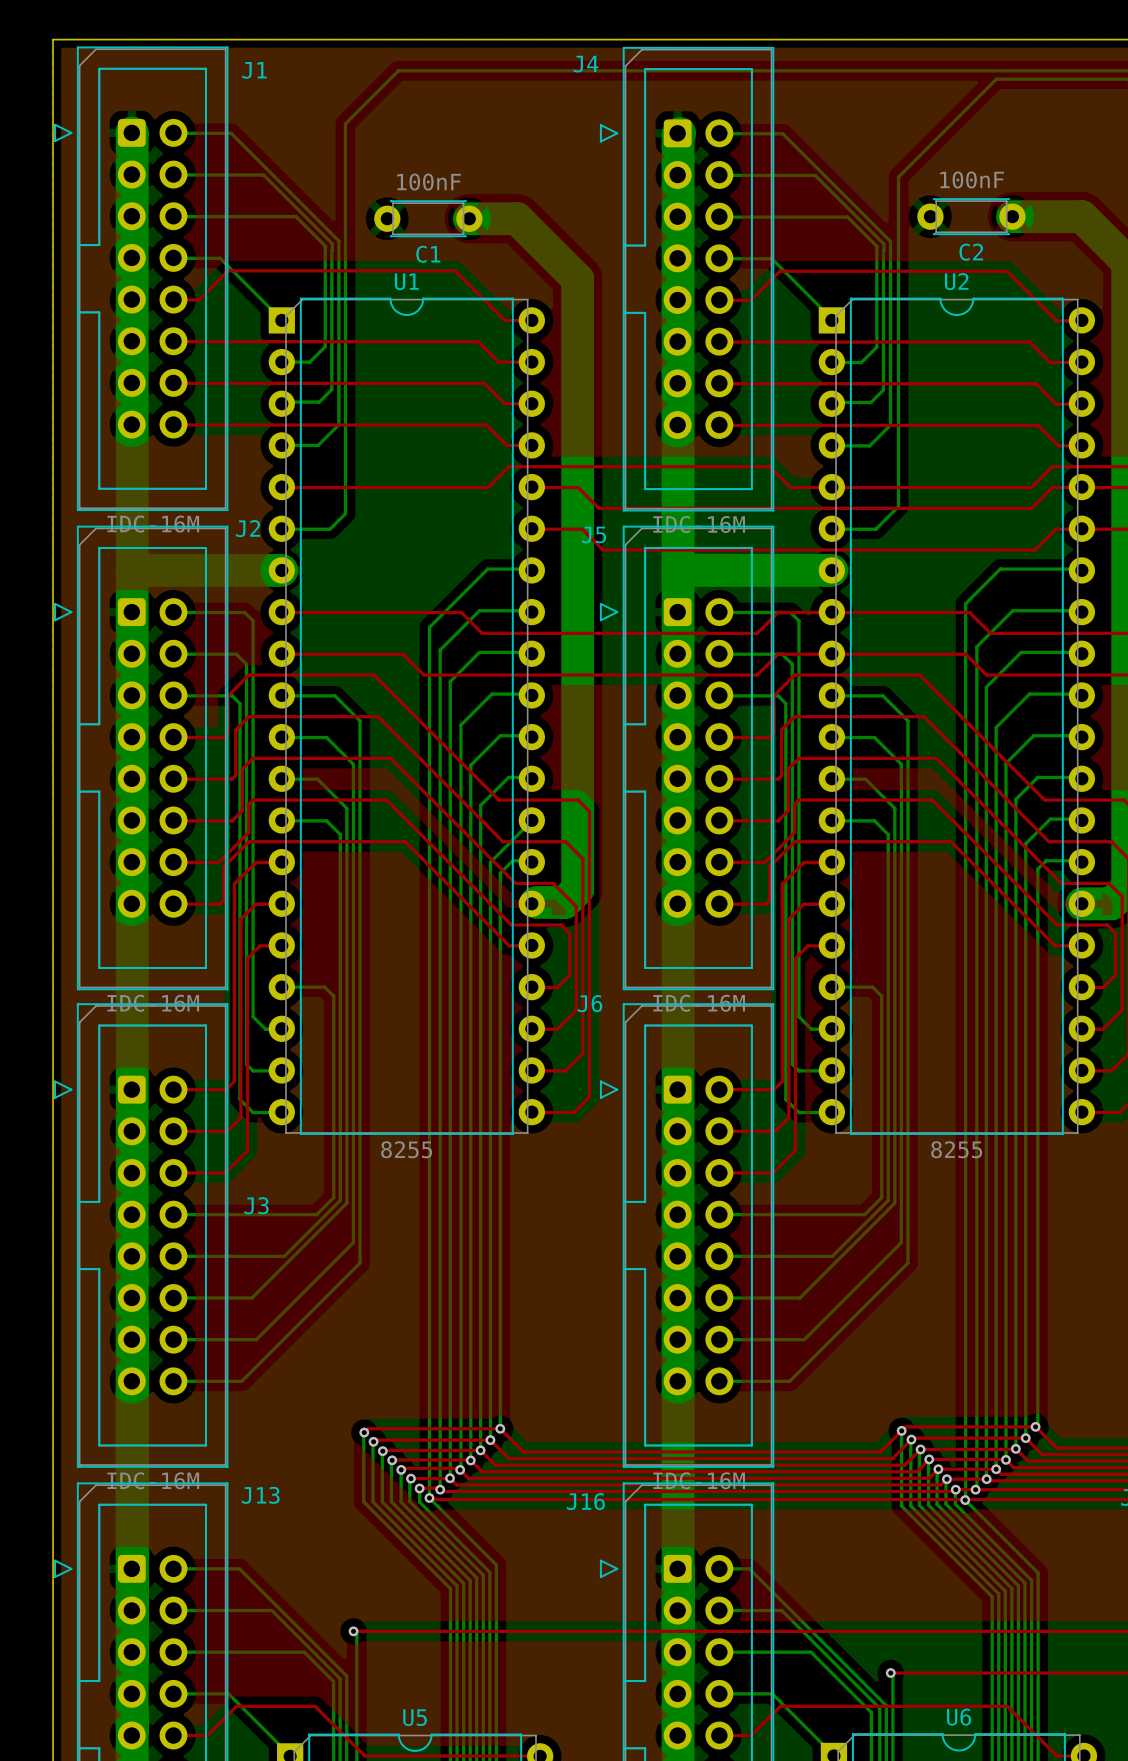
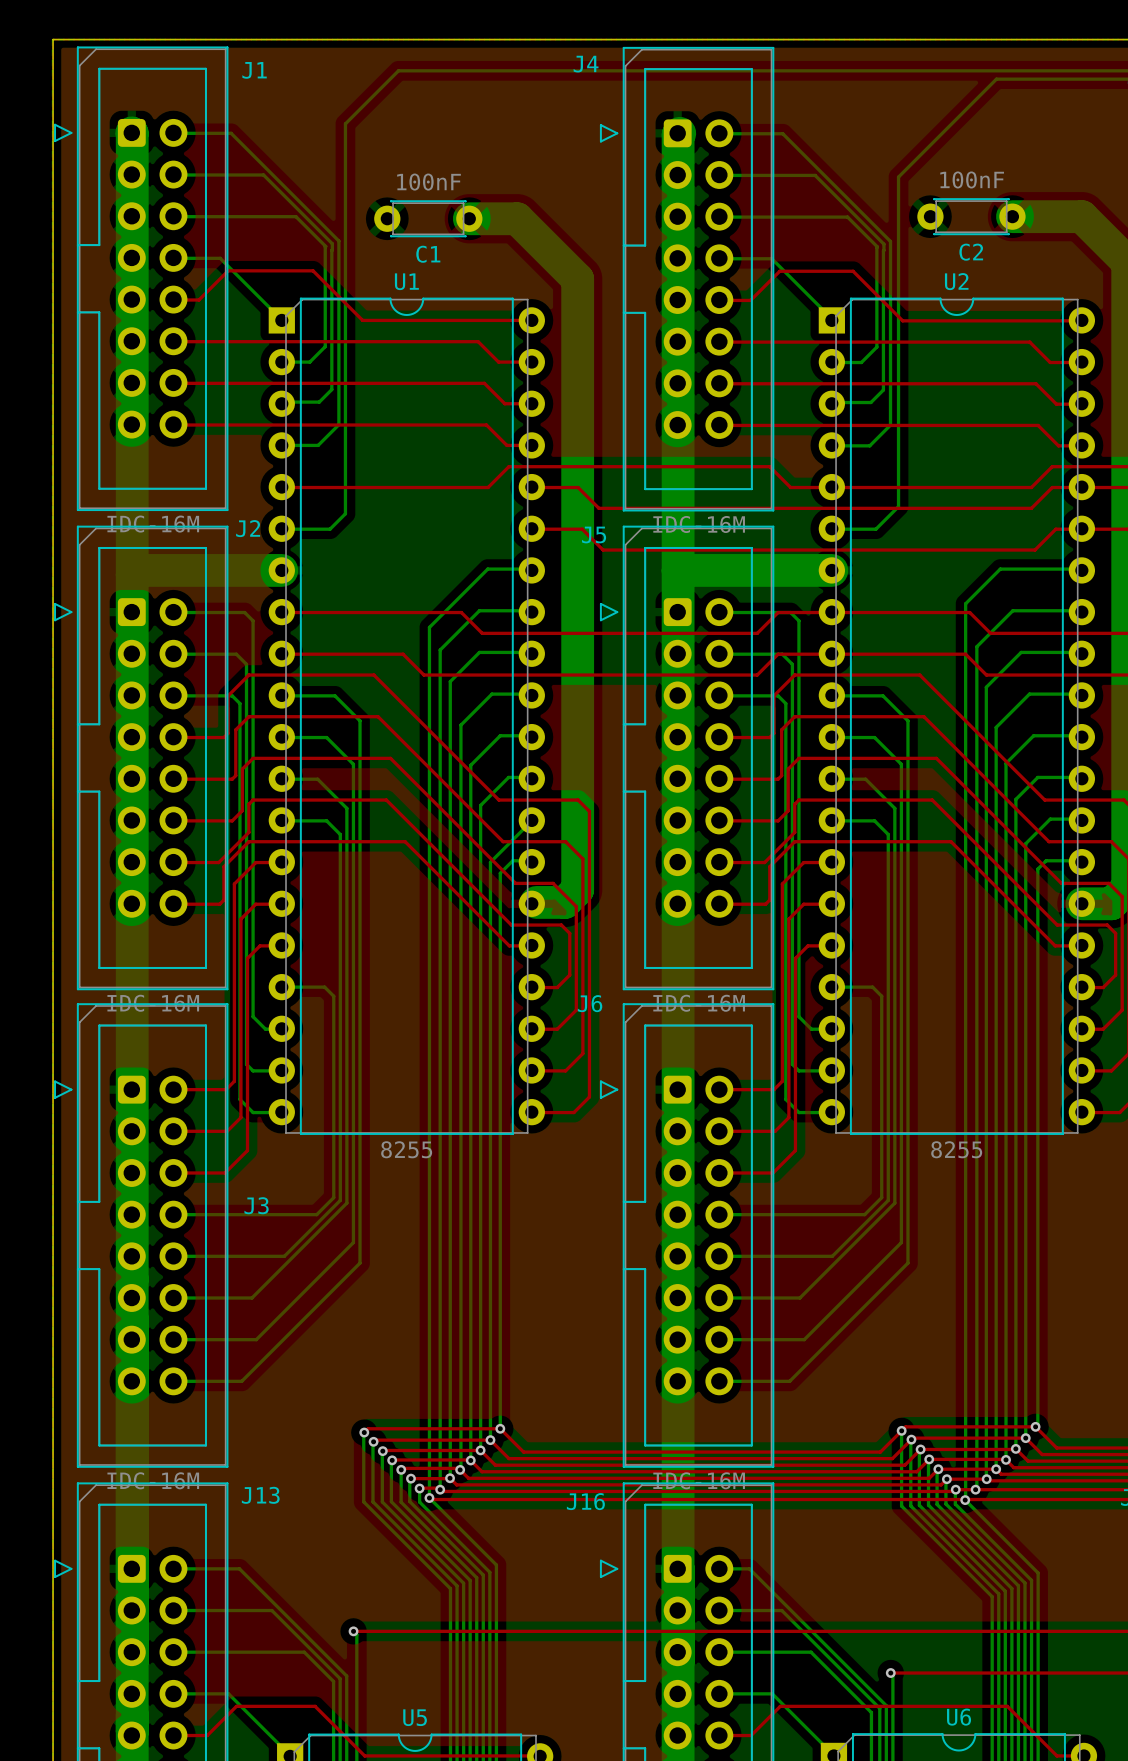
top track: (313, 270) (455, 270) (504, 320) -> (313, 270) (362, 320) (504, 320)
top track: (853, 271) (1006, 271) (1056, 320) -> (853, 271) (902, 320) (1056, 320)

